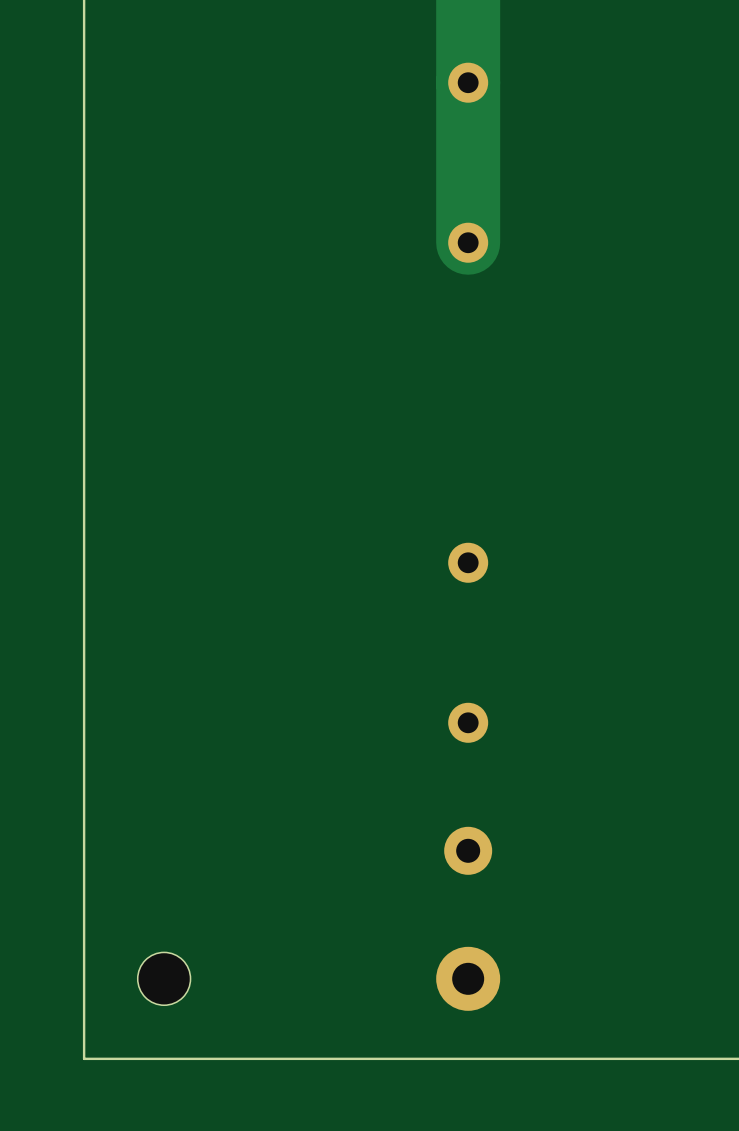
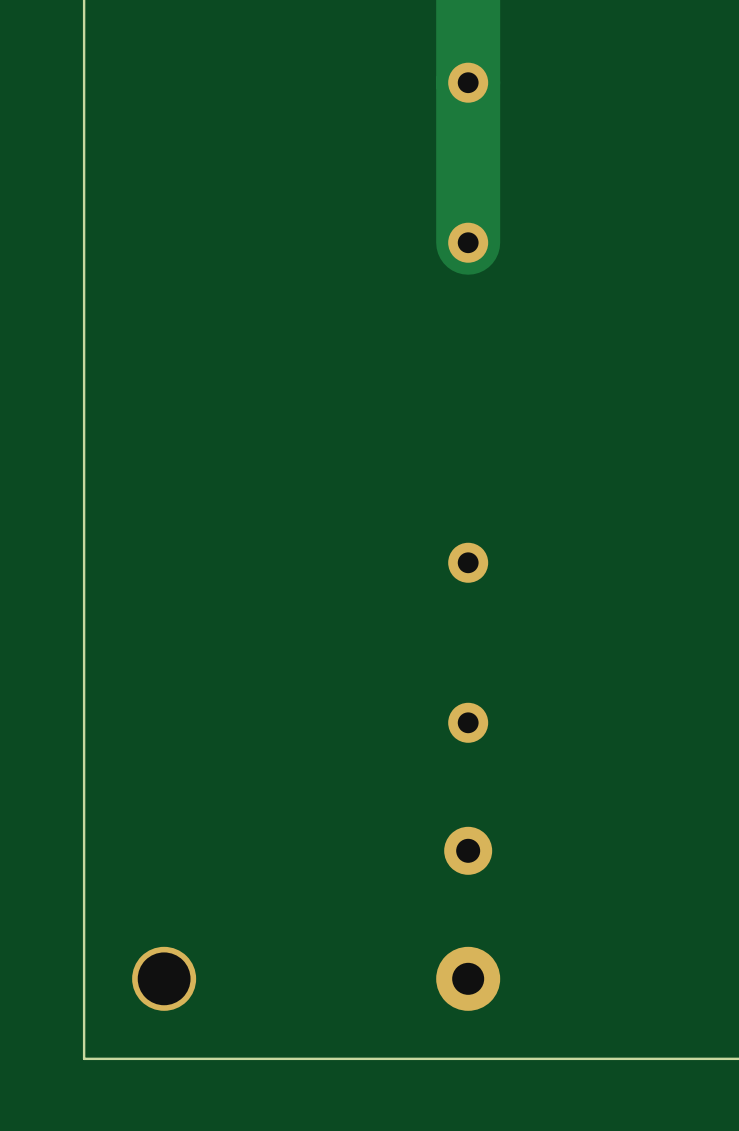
part footprint: [137, 952, 191, 1006] -> [132, 946, 197, 1011]

